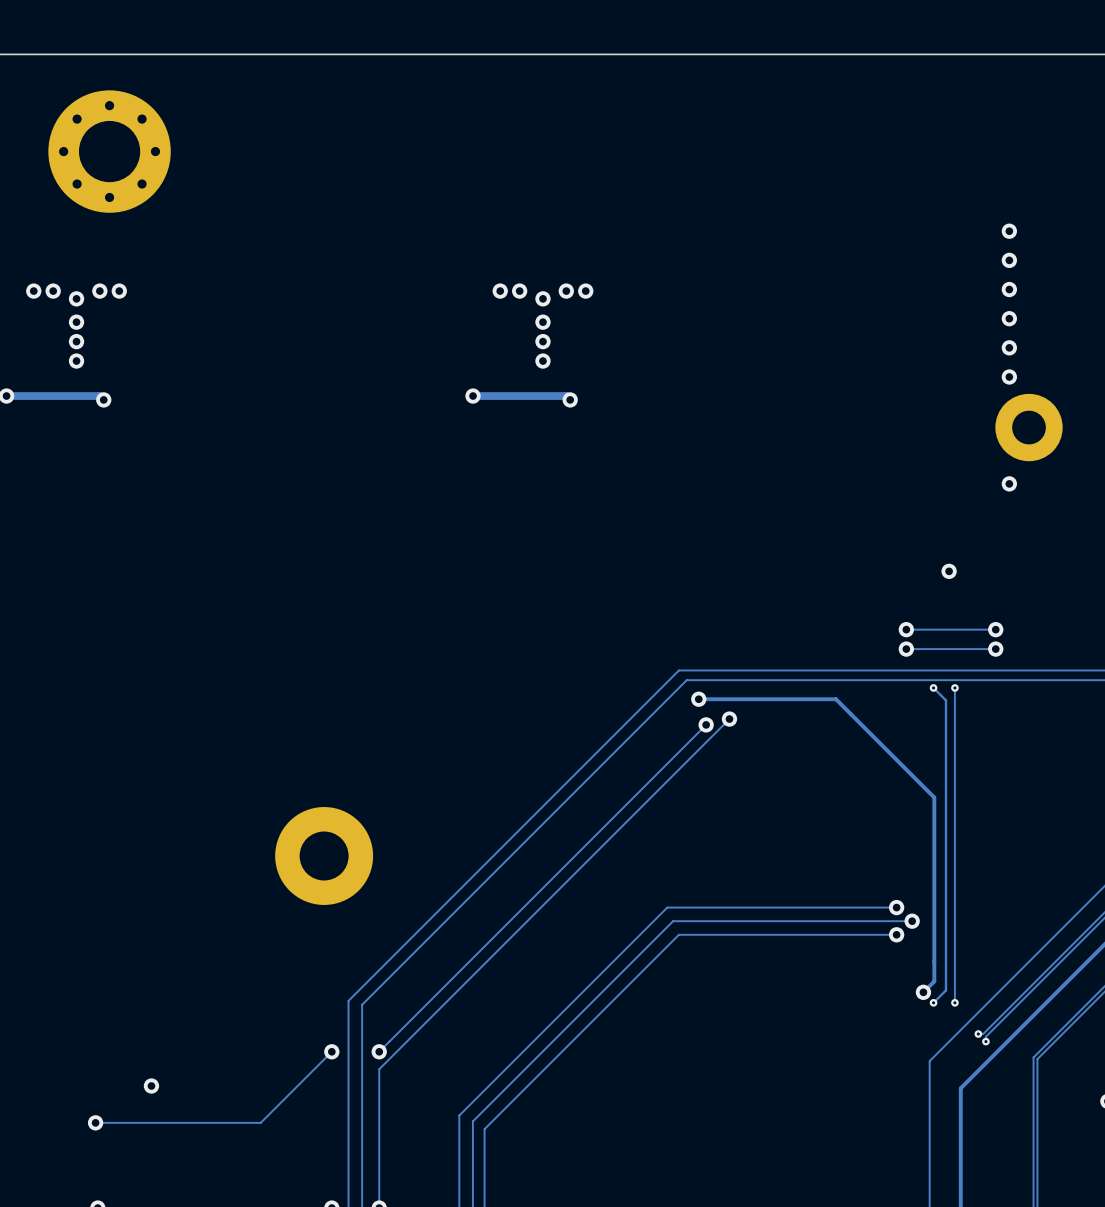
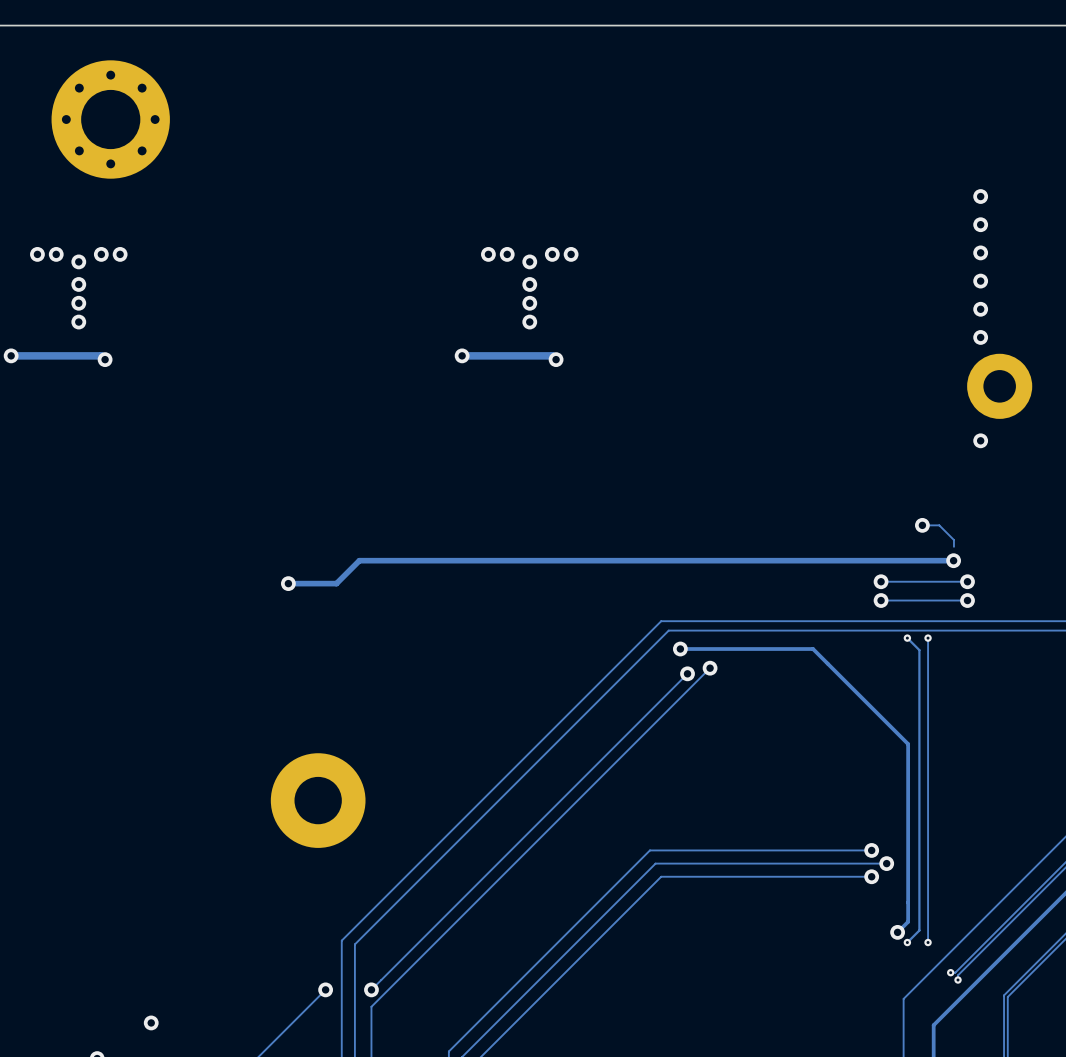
track: none -> (922, 525) (939, 525) (953, 540) (953, 546)
track: none -> (953, 560) (359, 560) (336, 583) (288, 583)
via: none -> (953, 560)
via: none -> (288, 583)

